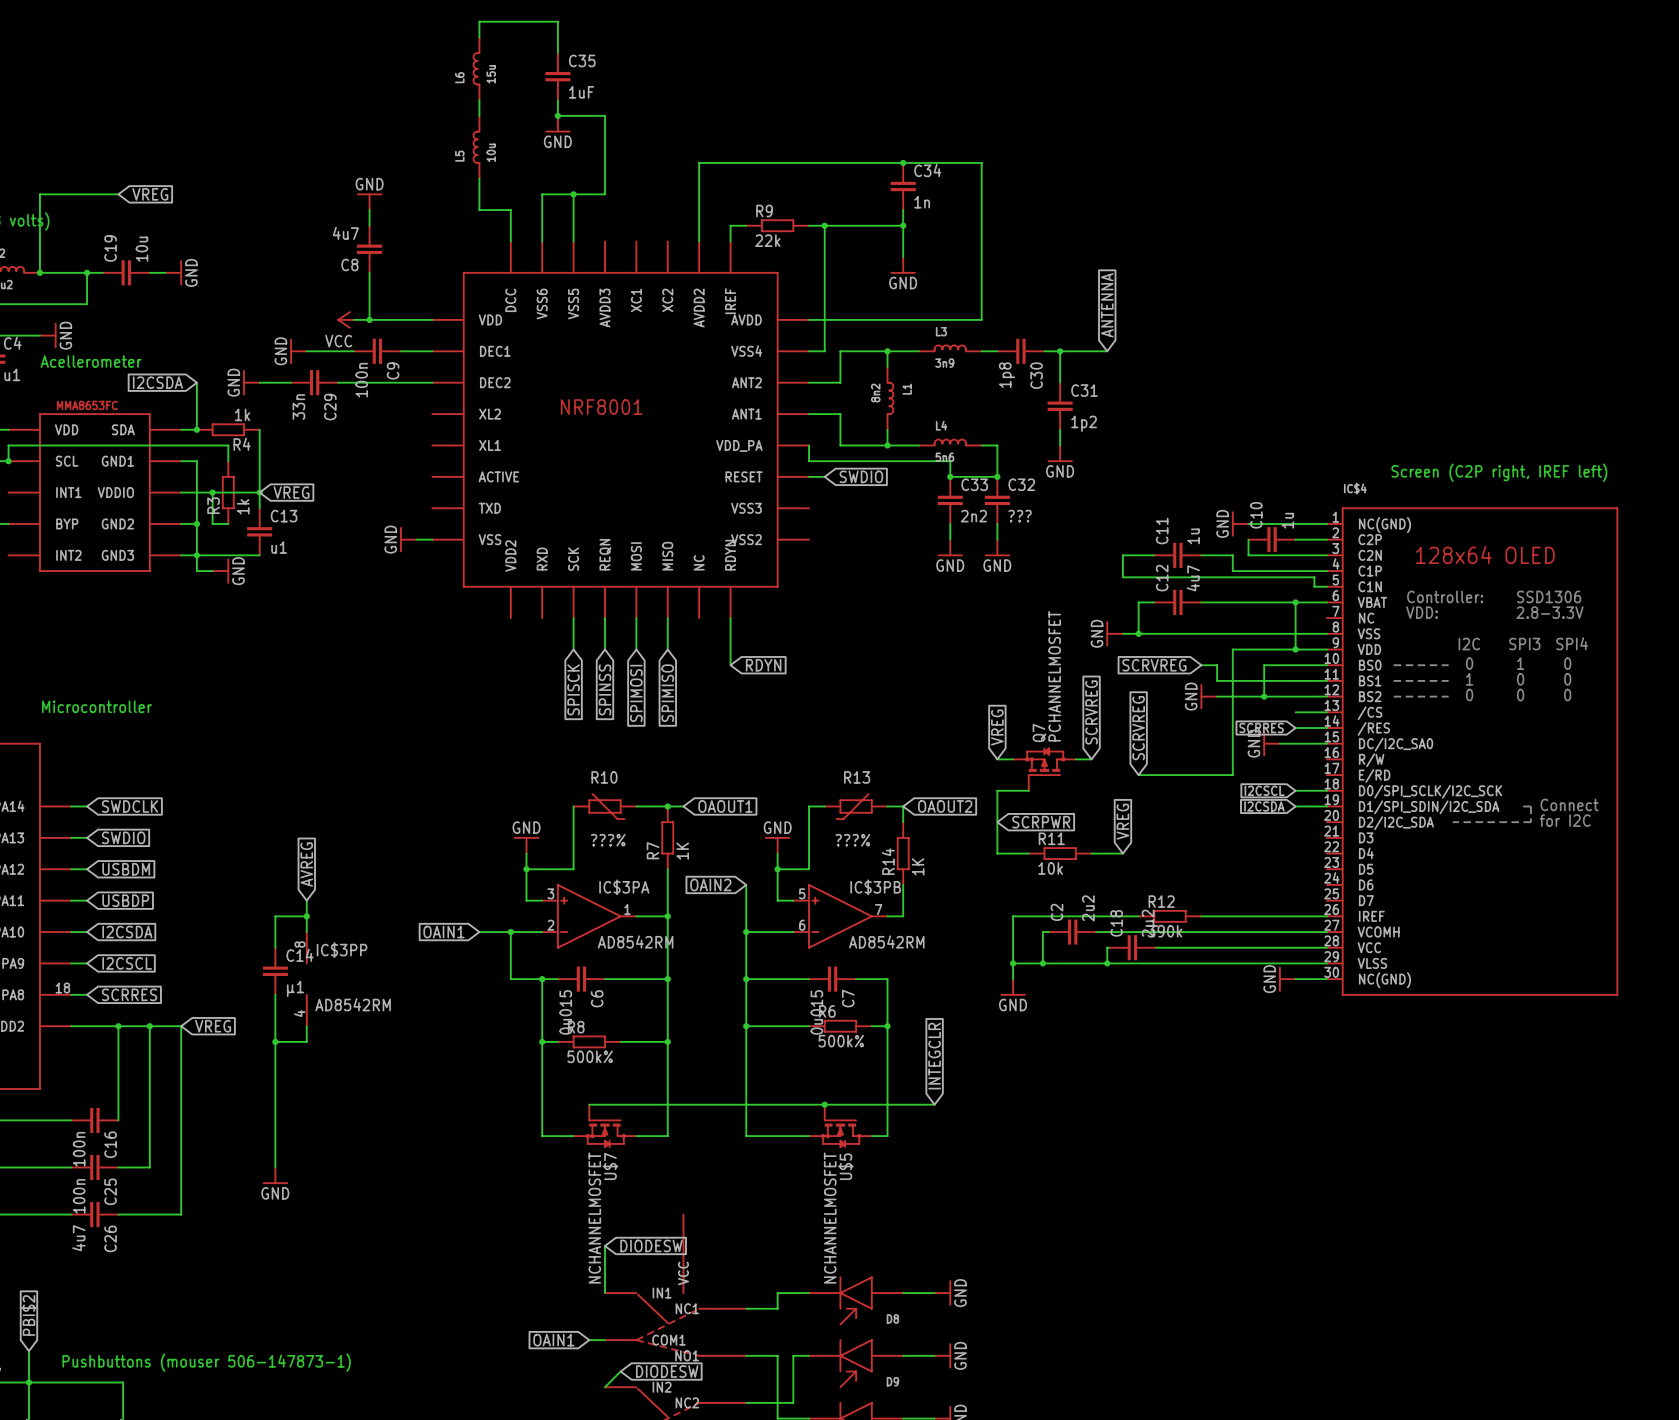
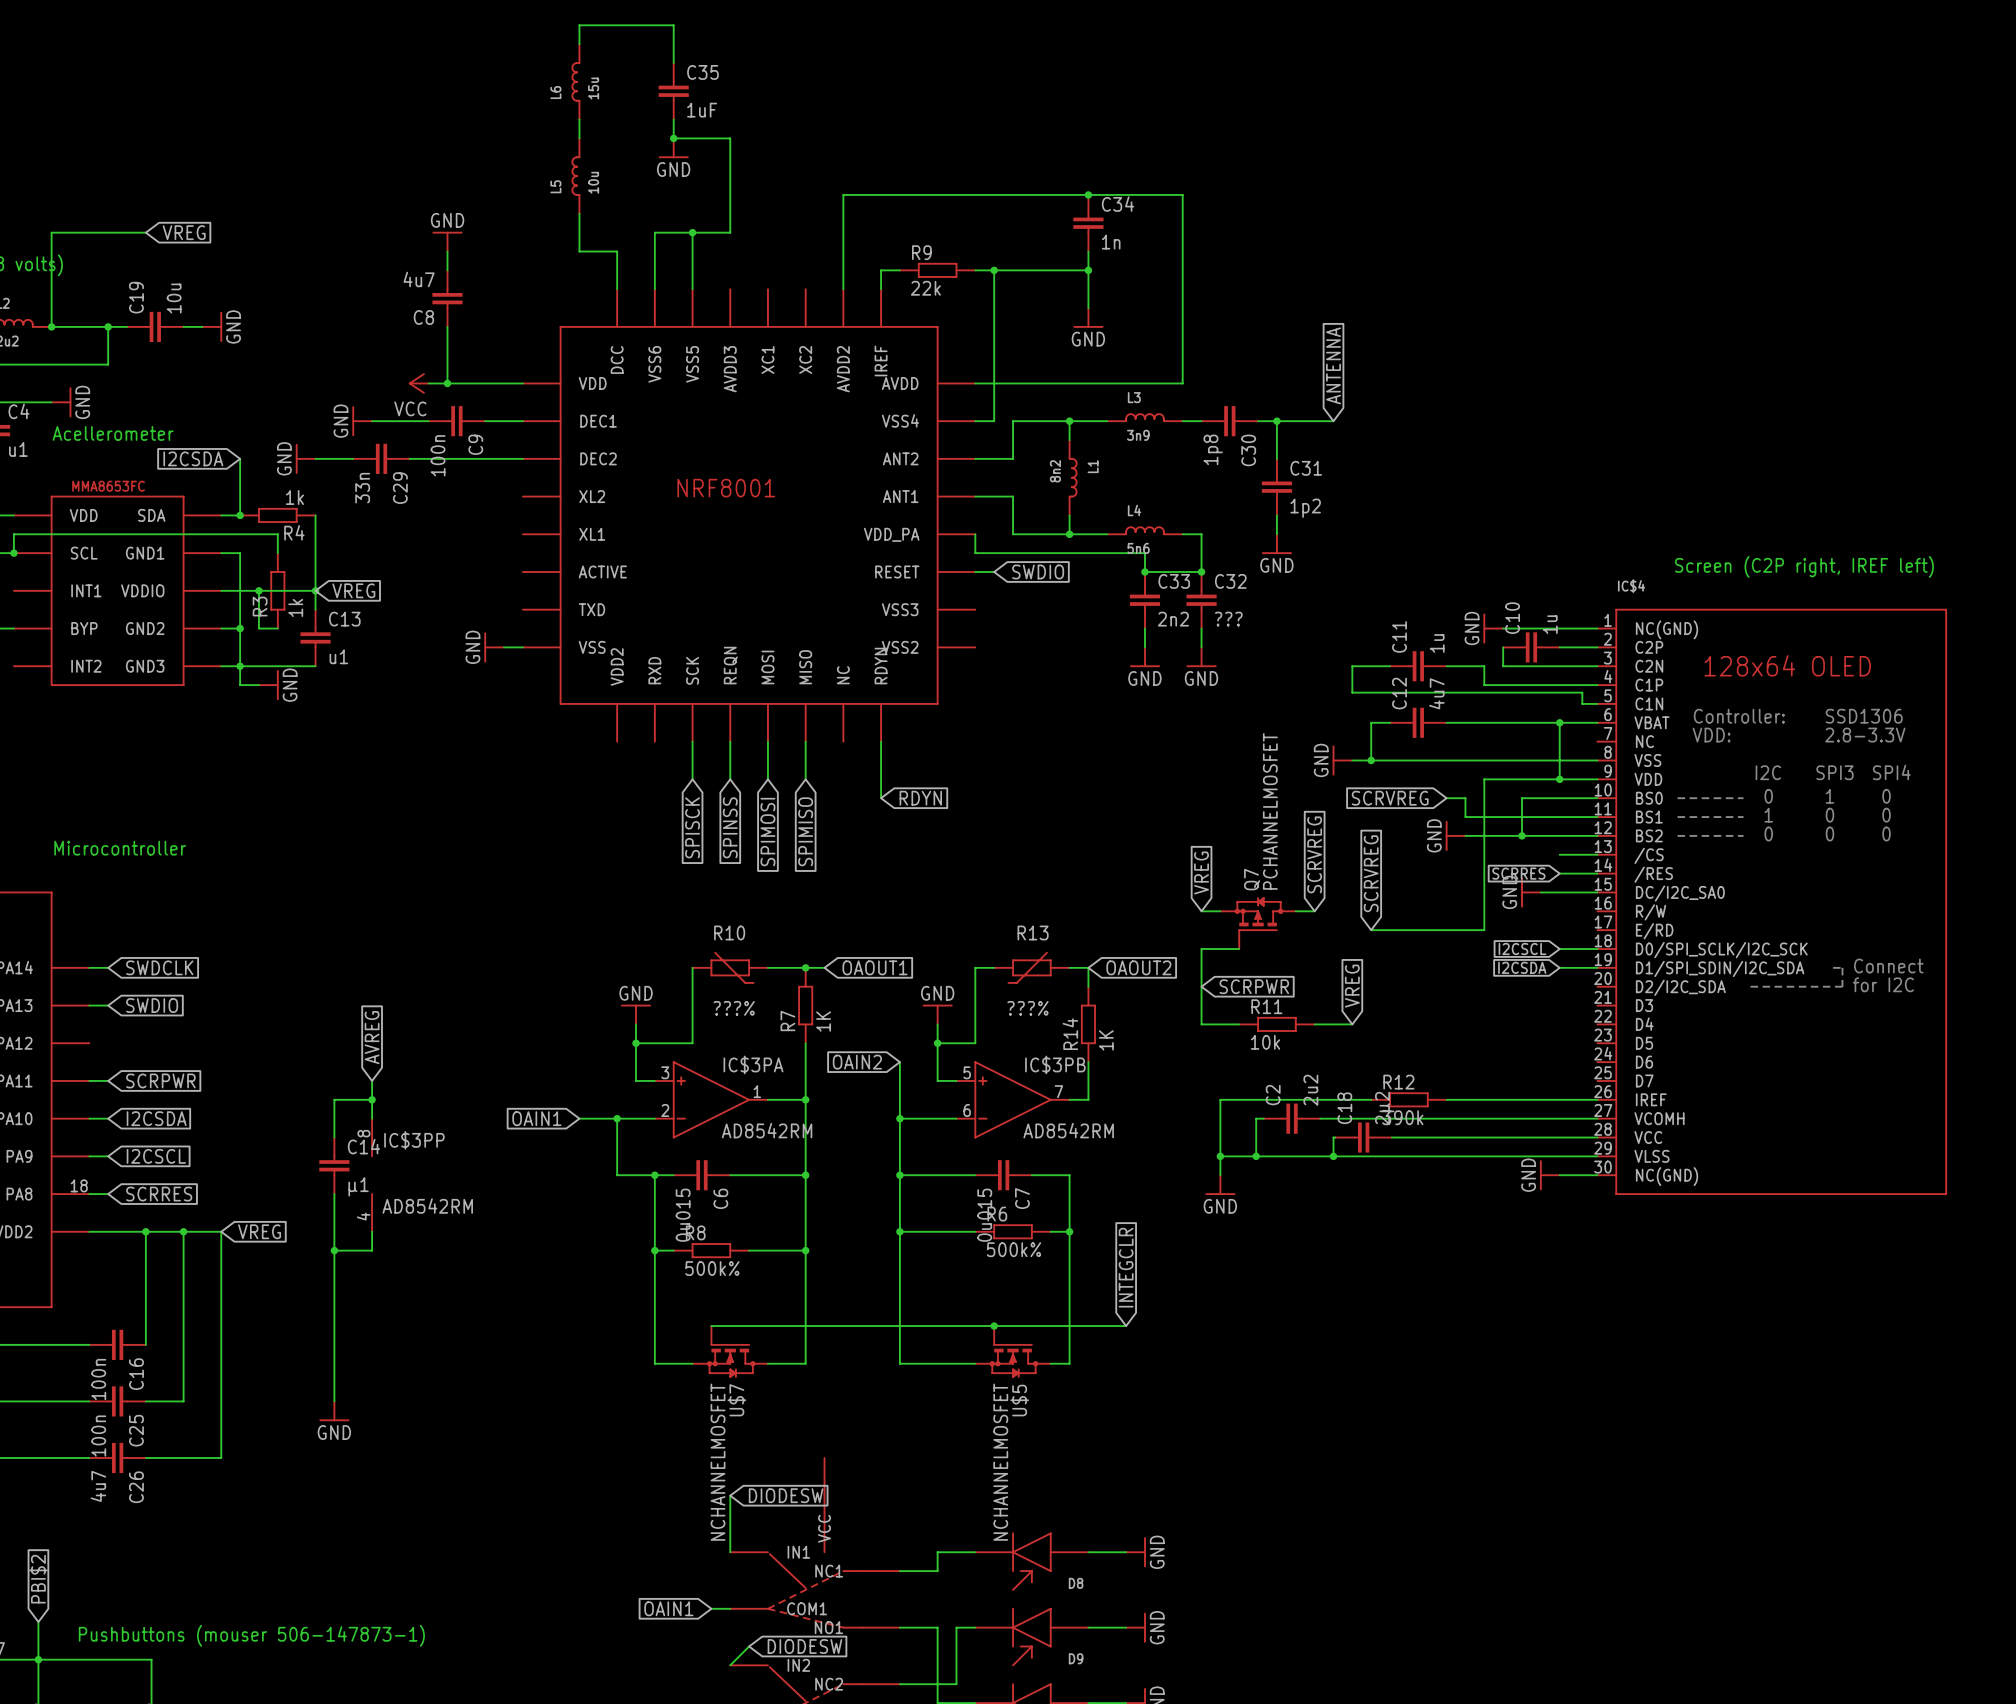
wire: (71, 869) (87, 869) -> none
global label: USBDM (126, 869) -> none
global label: USBDP (125, 900) -> SCRPWR (160, 1080)

